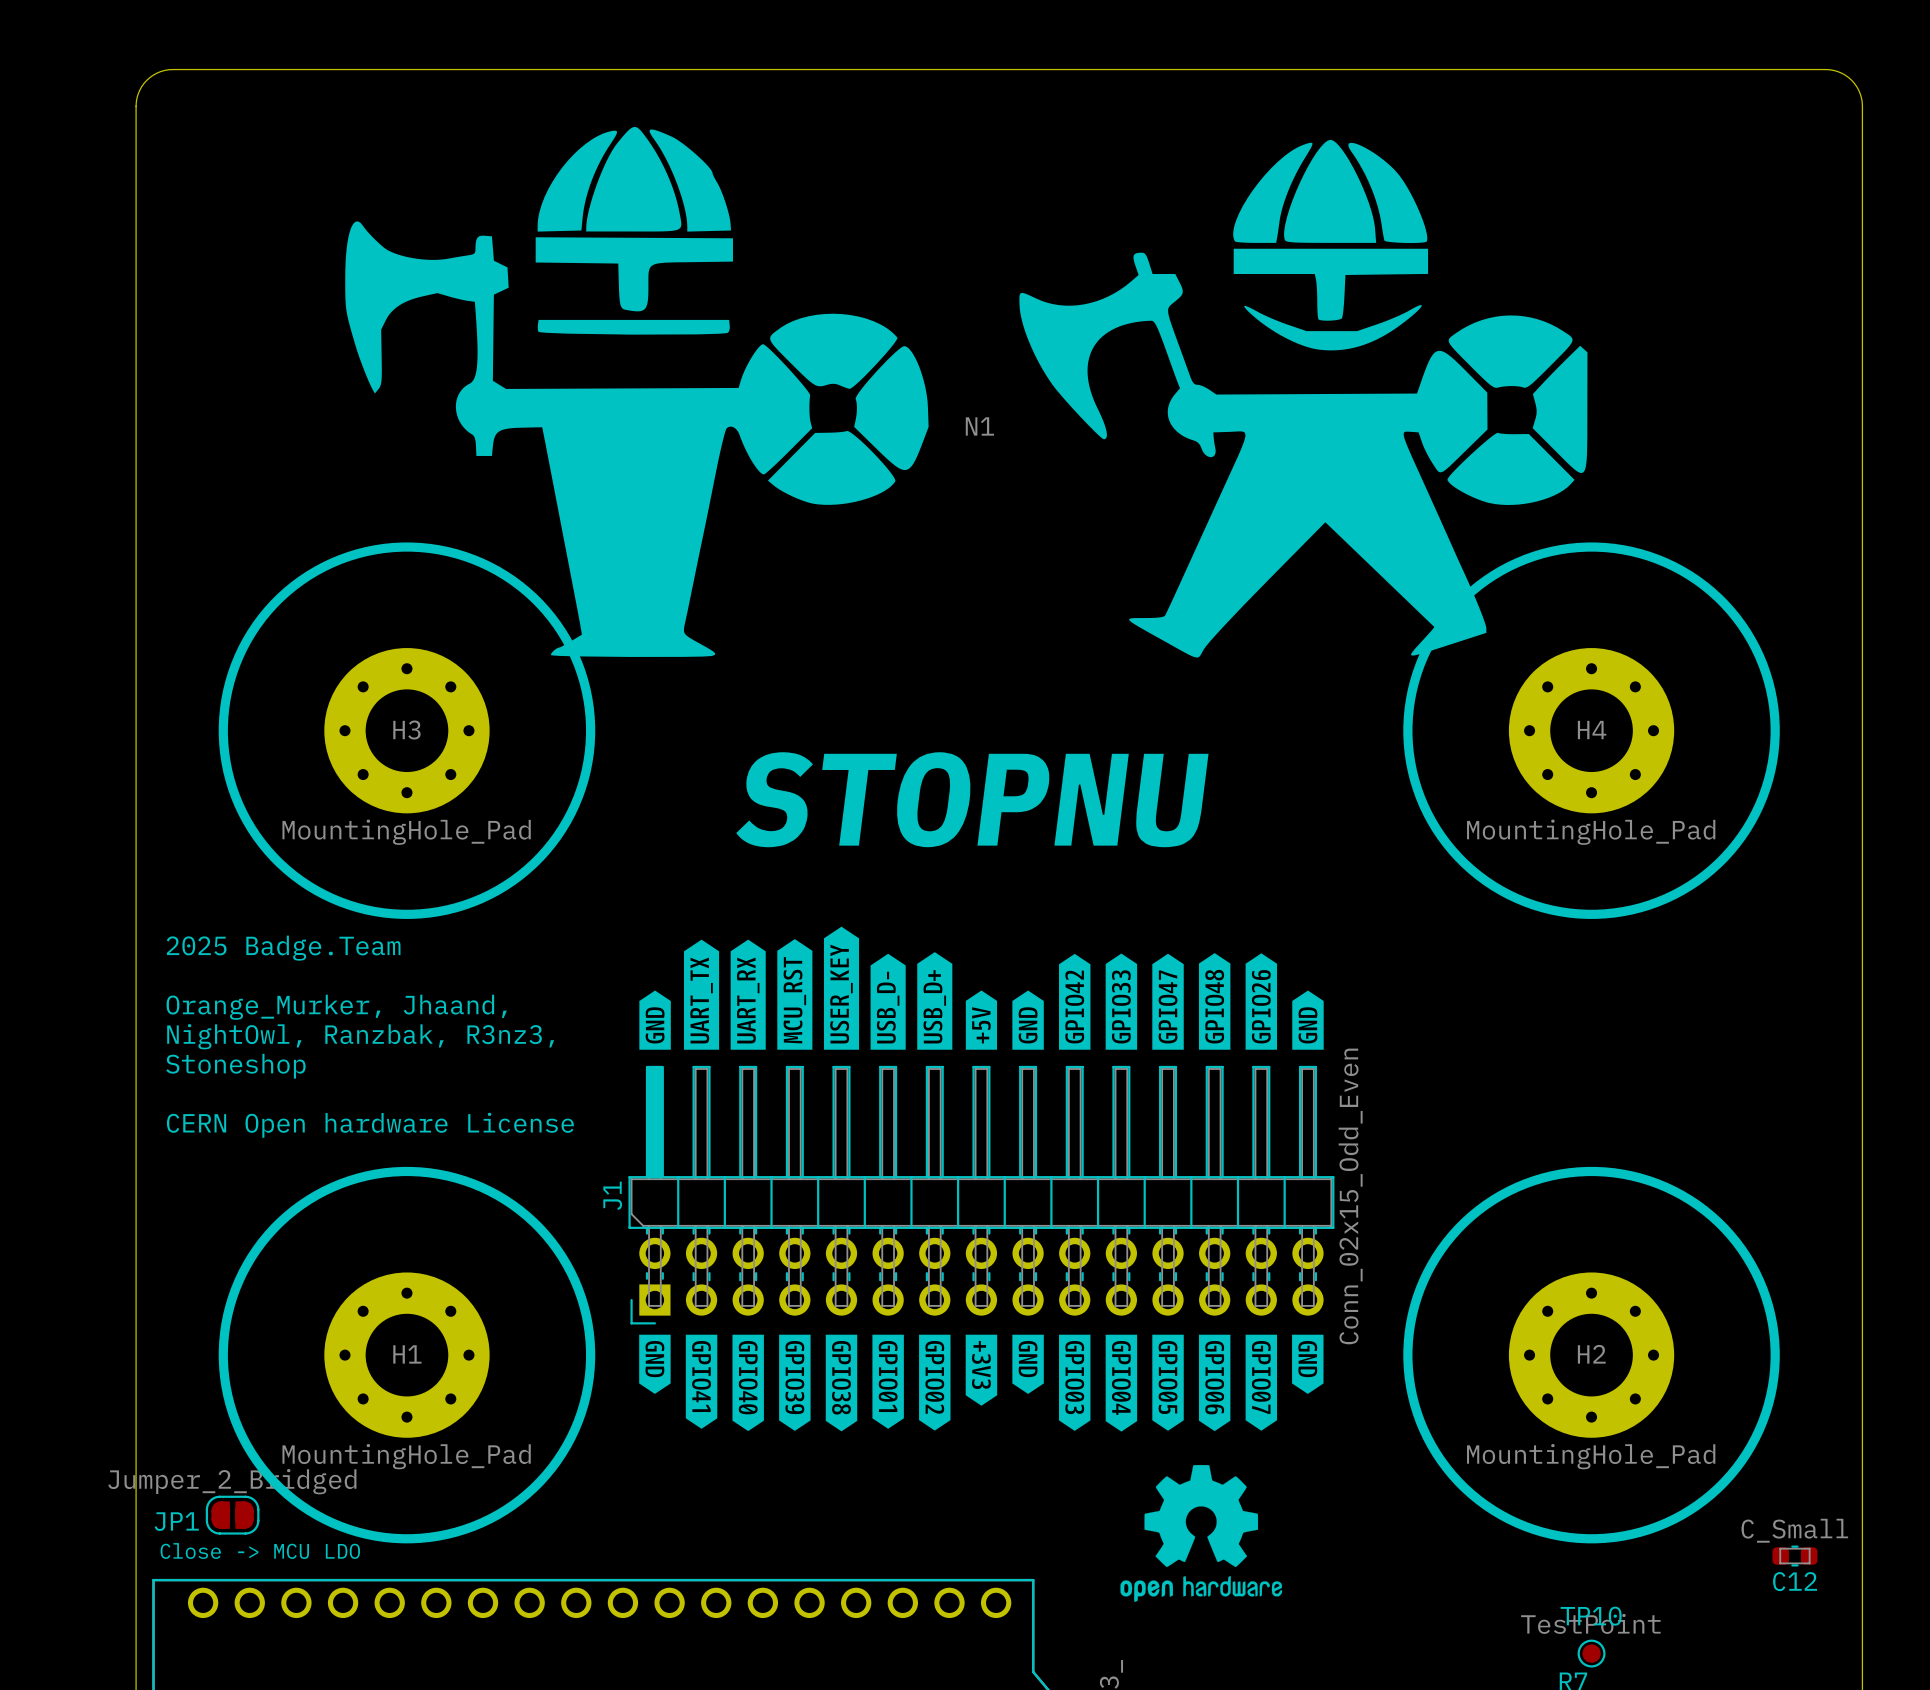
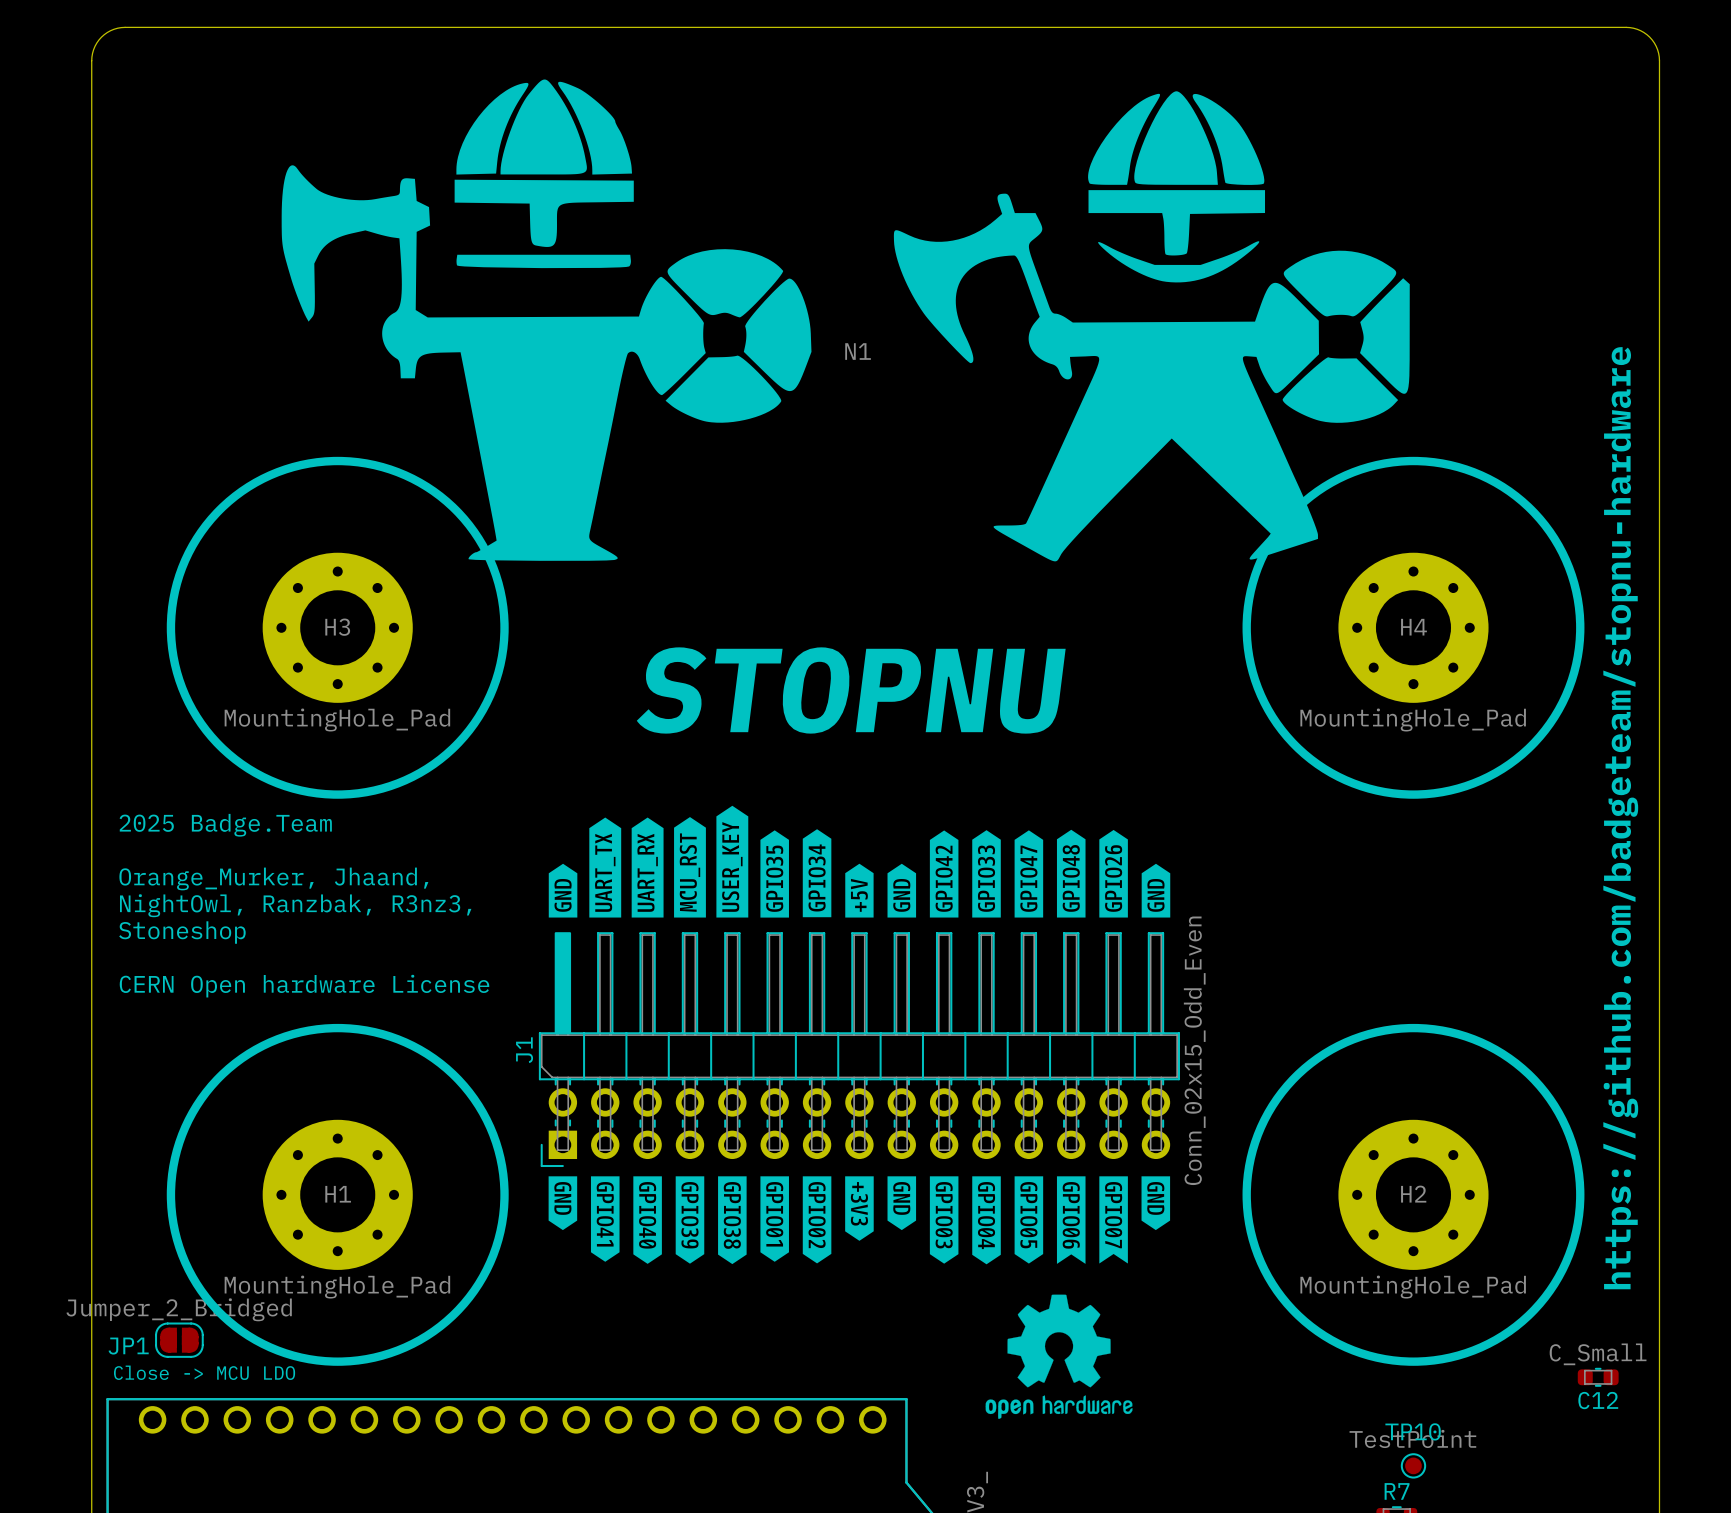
text: none -> https://github.com/badgeteam/stopnu-hardware (1620, 818)
drawing shape: [917, 952, 953, 1050] -> [802, 829, 832, 918]
drawing shape: [870, 953, 906, 1050] -> [760, 830, 789, 918]
drawing shape: [1198, 1334, 1231, 1432] -> [1056, 1176, 1086, 1264]
drawing shape: [1245, 1334, 1278, 1431] -> [1099, 1176, 1128, 1264]

